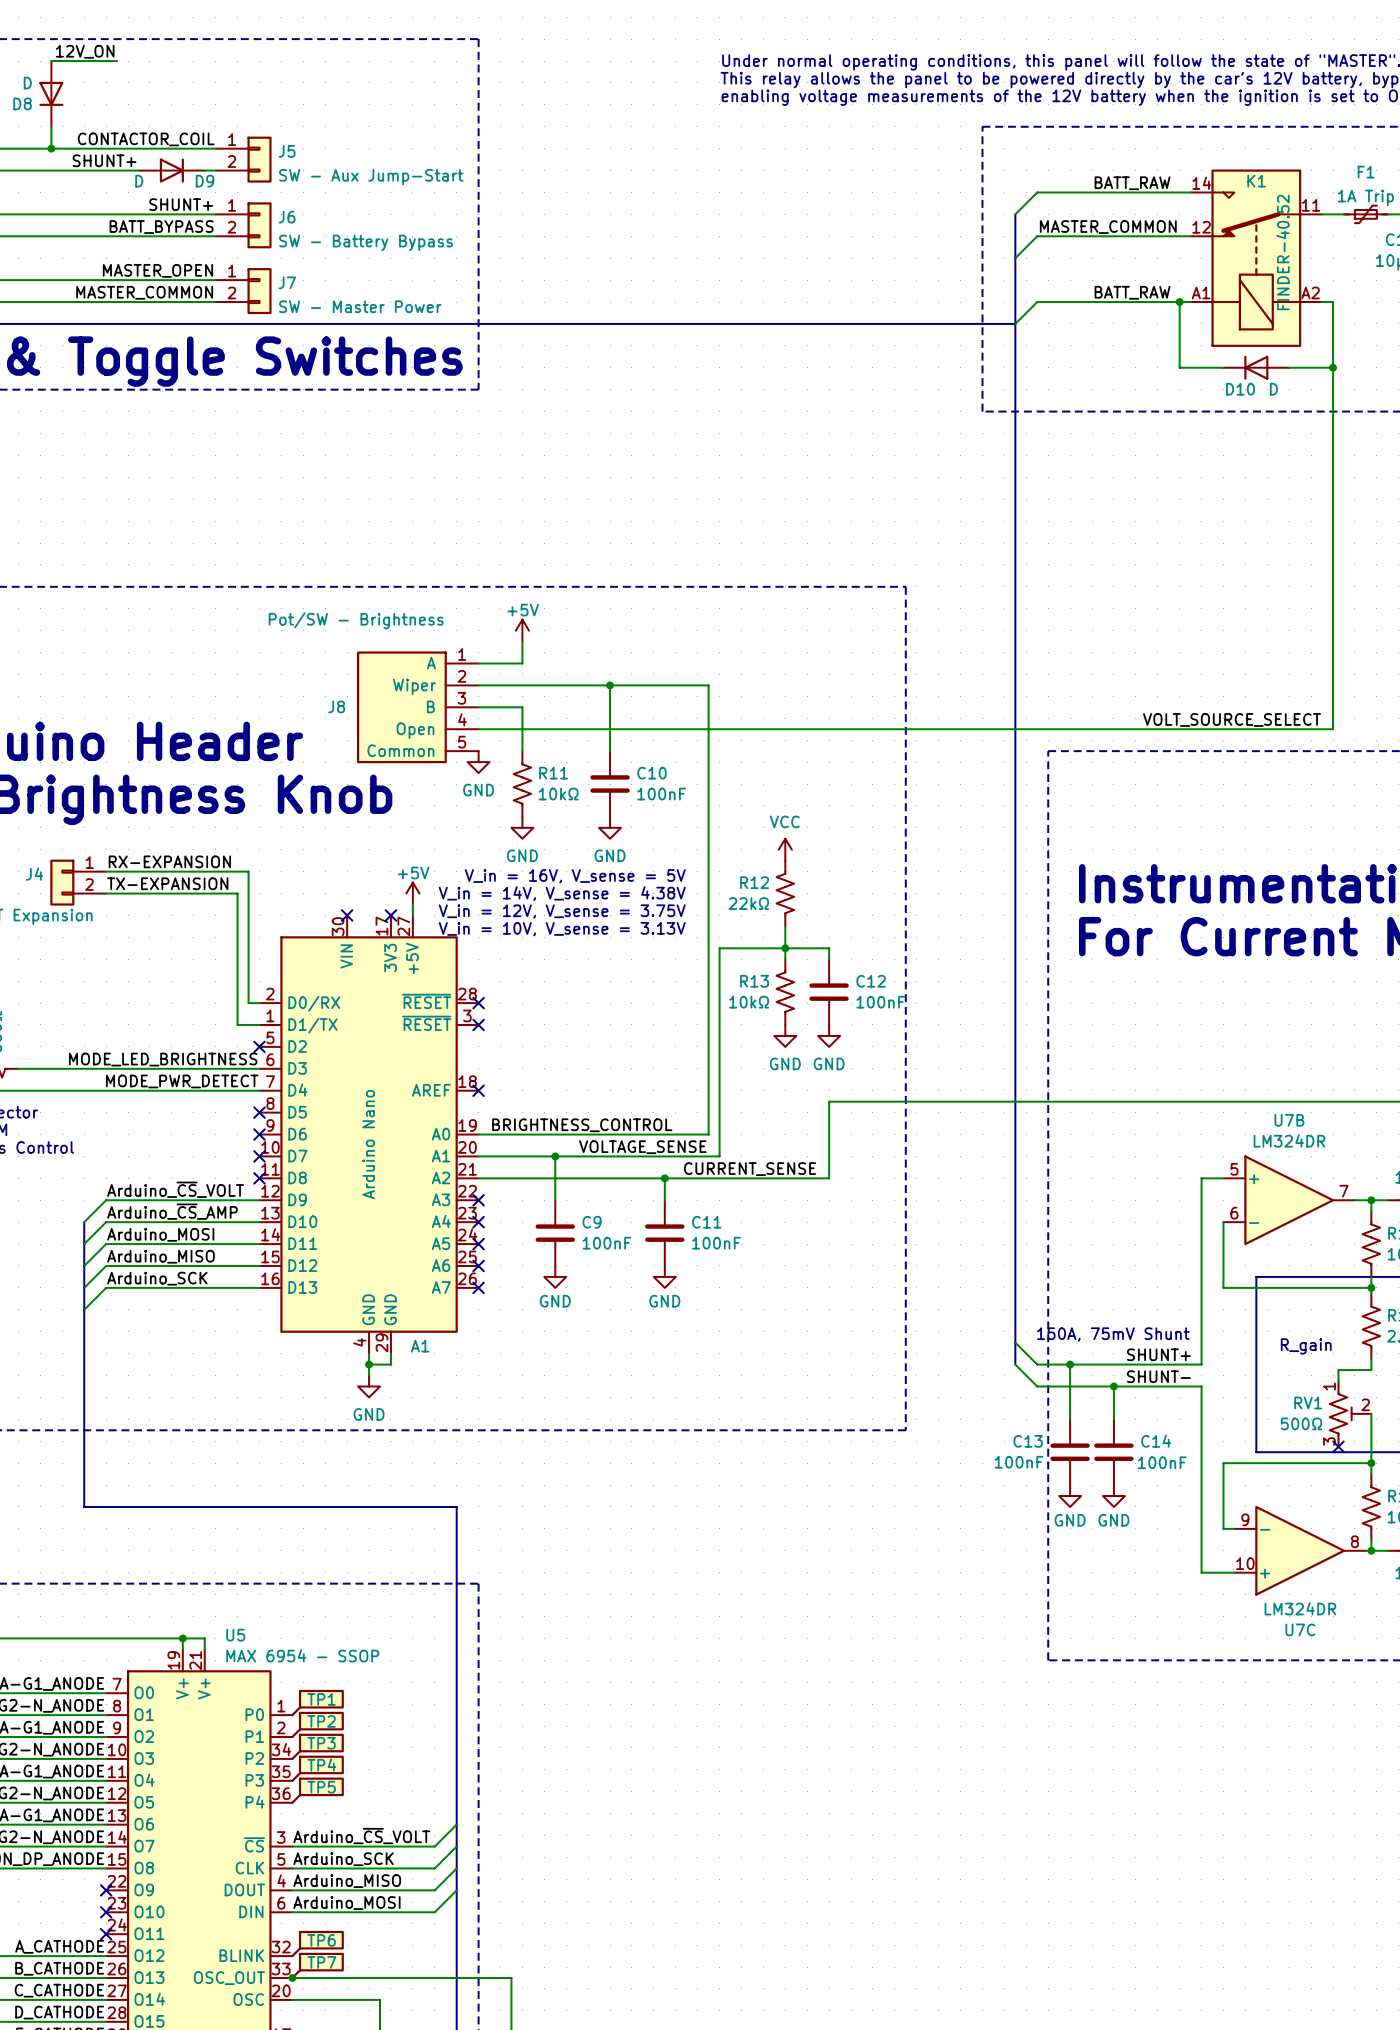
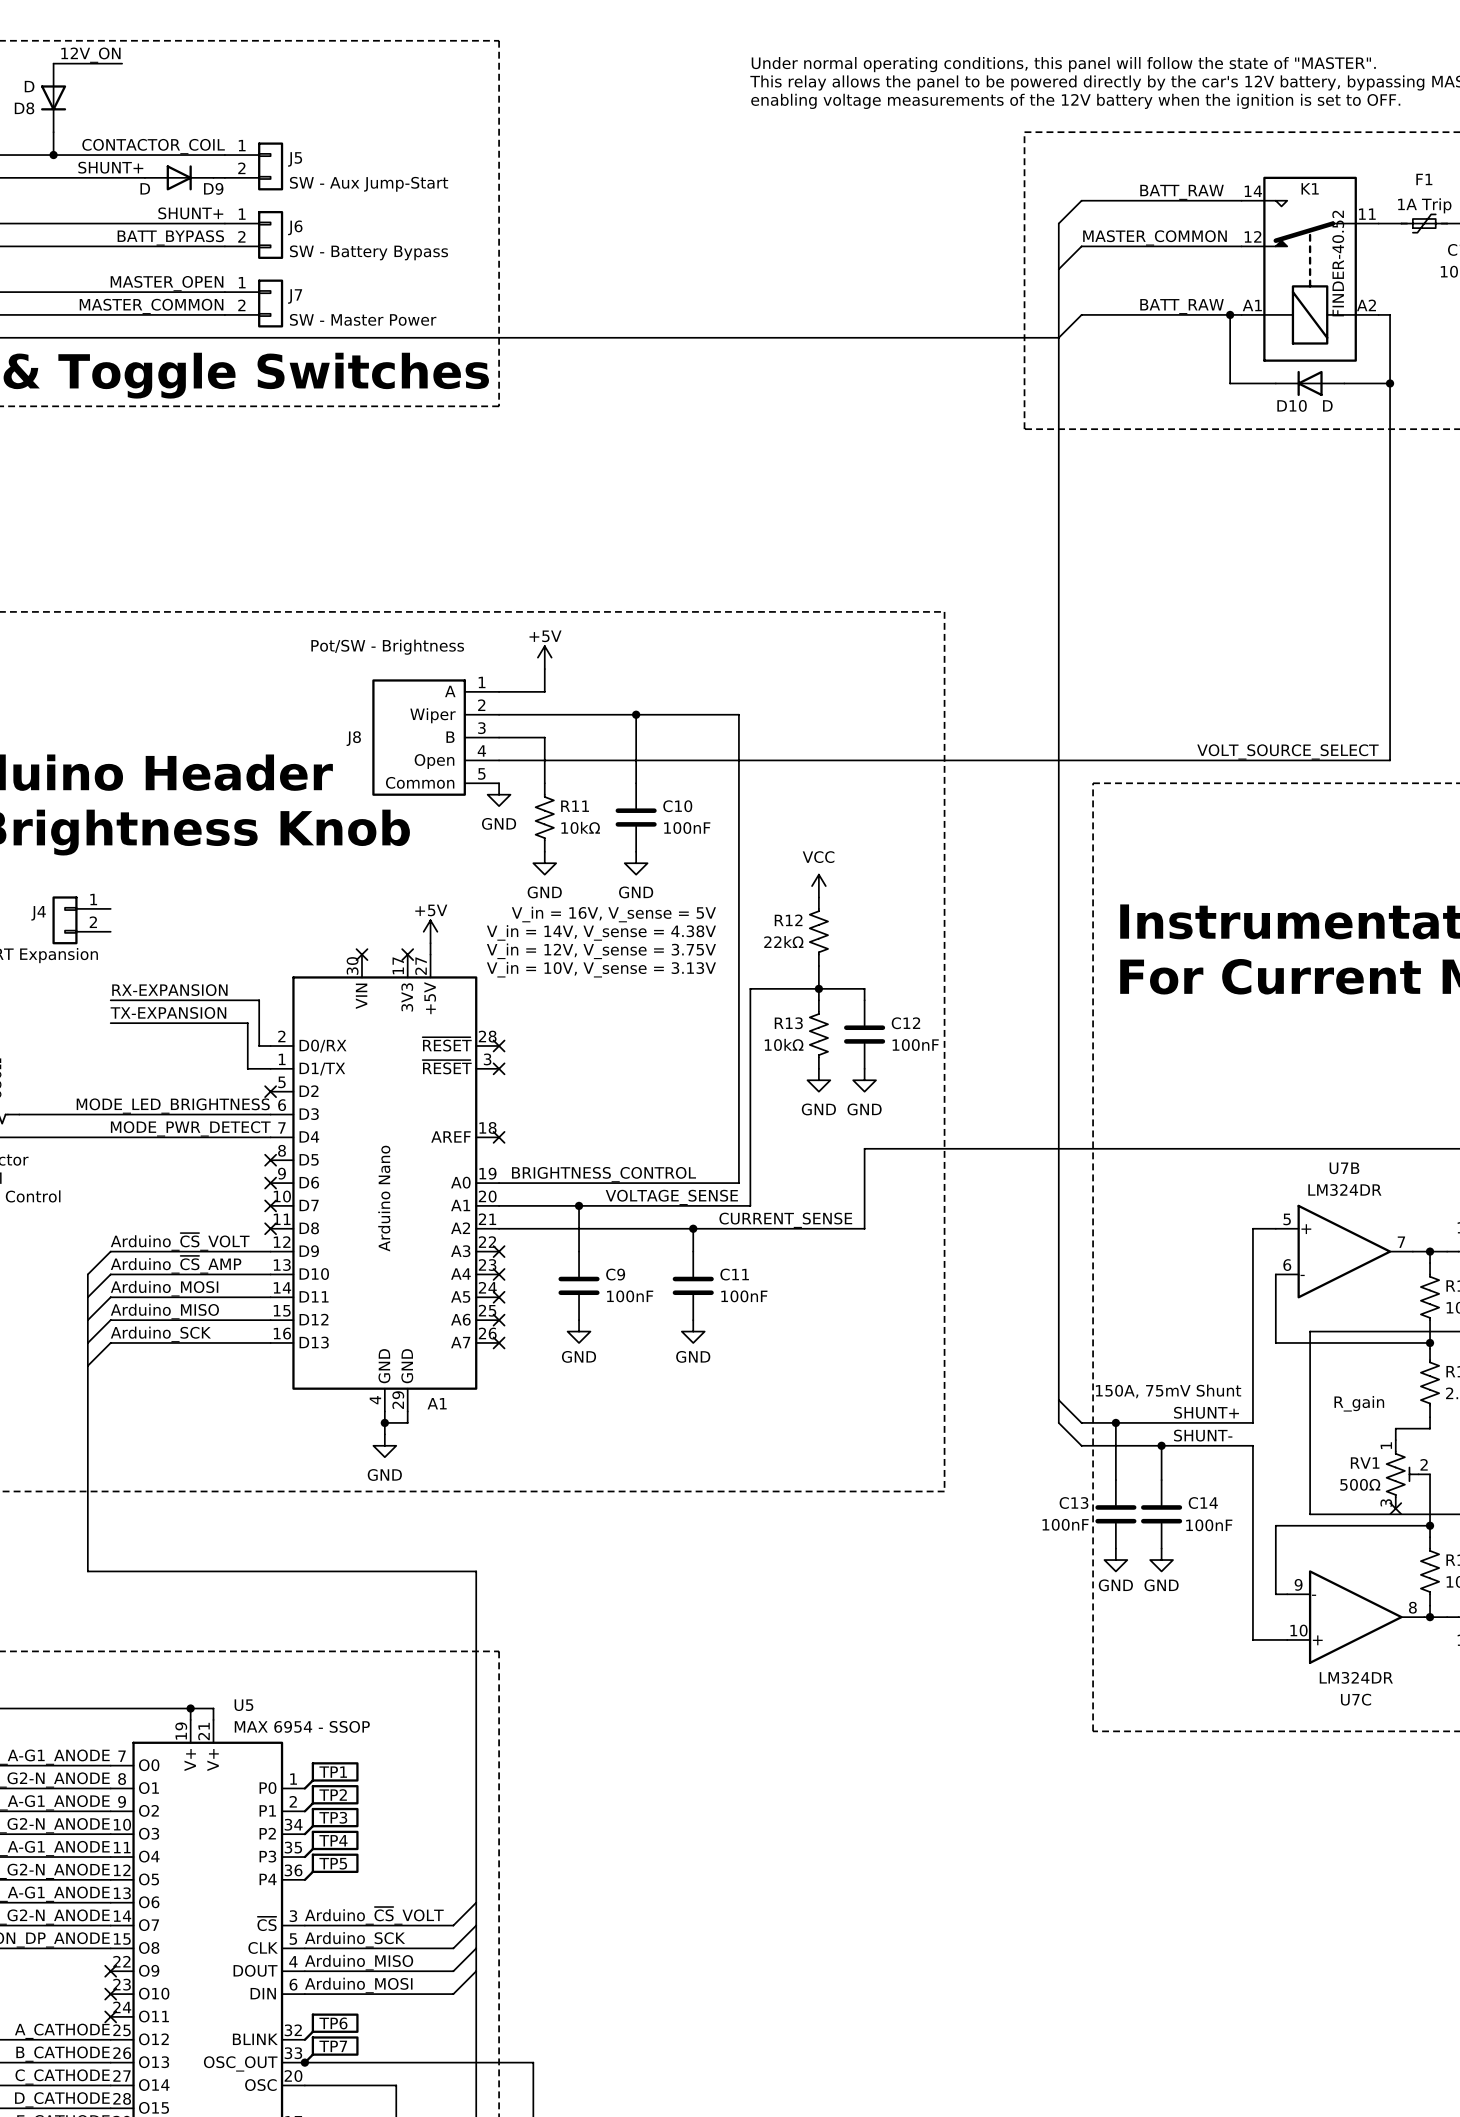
label position: RX-EXPANSION (169, 861) -> RX-EXPANSION (169, 990)
wire: (106, 871) (248, 871) (248, 959) -> (110, 1000) (259, 1000)
label position: TX-EXPANSION (167, 883) -> TX-EXPANSION (168, 1012)
wire: (106, 893) (237, 893) (237, 981) -> (110, 1023) (247, 1023)

